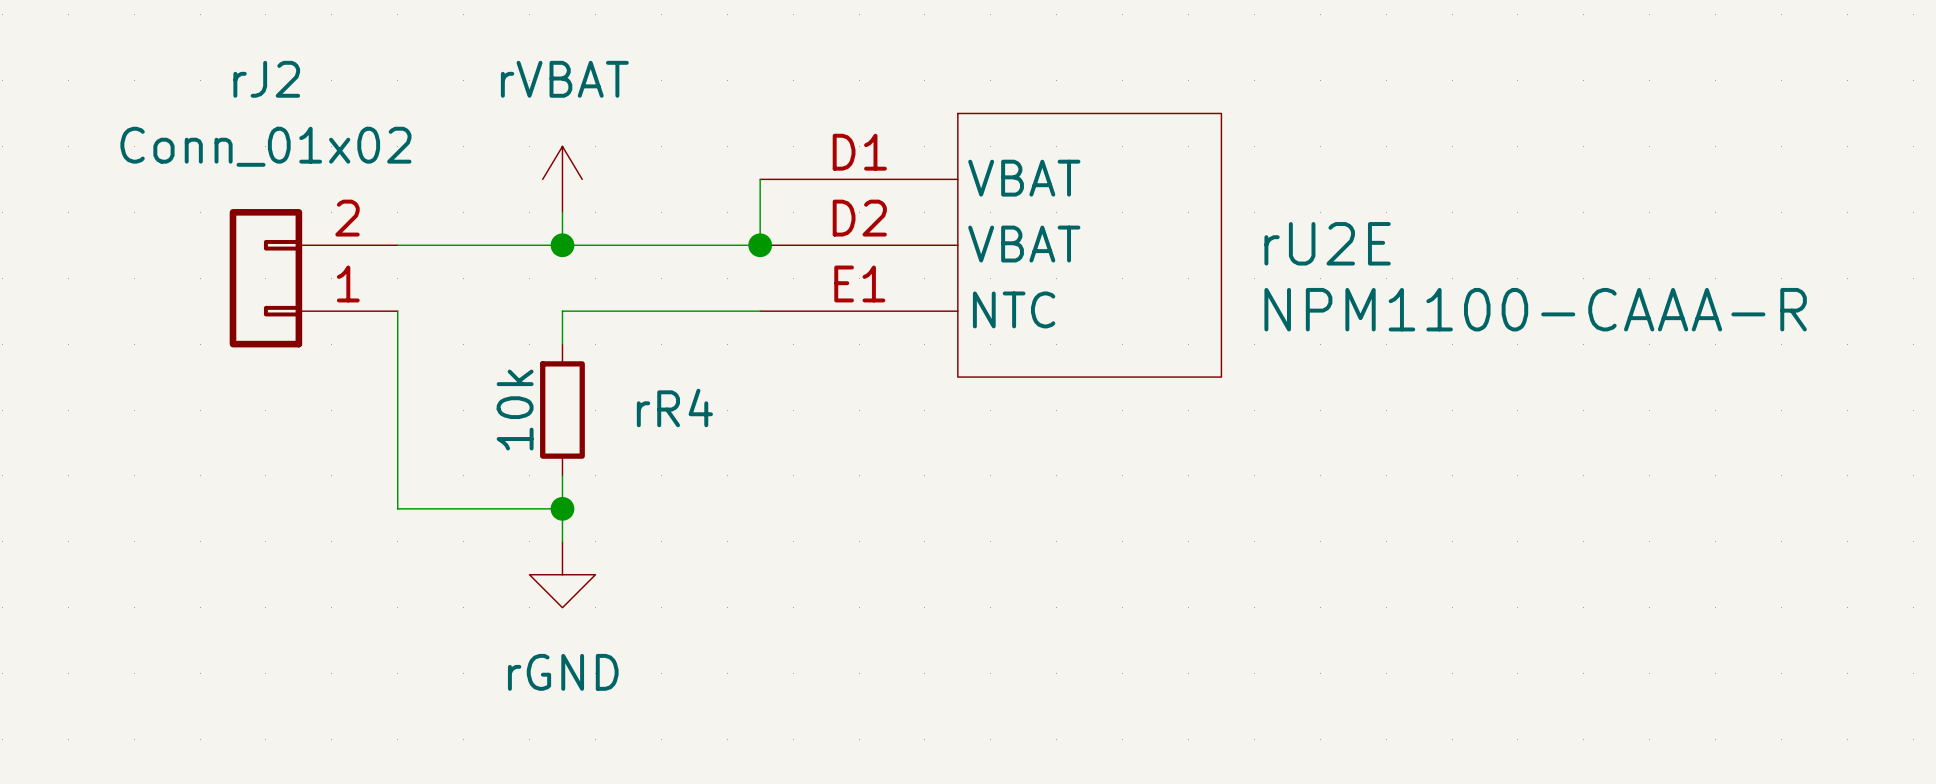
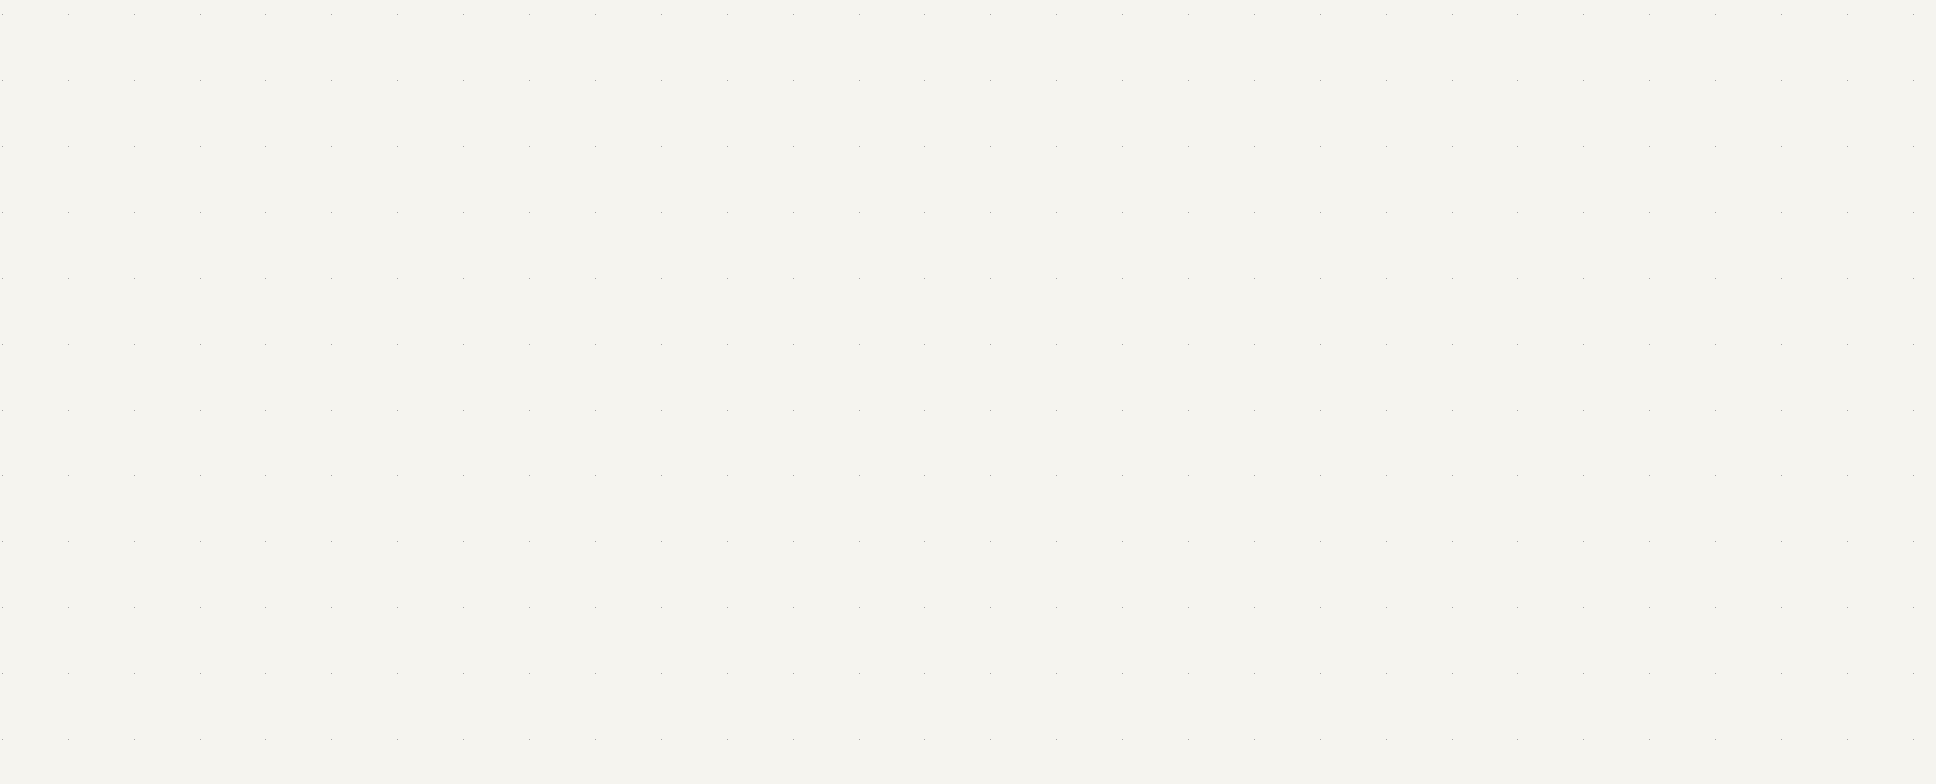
power symbol: rVBAT (562, 179) -> none
wire: (760, 179) (760, 245) (397, 245) -> none
wire: (562, 212) (562, 245) -> none
junction: (562, 245) -> none
junction: (760, 245) -> none
rU2E: NPM1100-CAAA-R (990, 245) -> none
rJ2: Conn_01x02 (313, 278) -> none
wire: (397, 311) (397, 508) (562, 508) -> none
wire: (760, 311) (562, 311) (562, 344) -> none
rR4: 10k (562, 410) -> none
wire: (562, 475) (562, 541) -> none
junction: (562, 508) -> none
power symbol: rGND (562, 574) -> none

